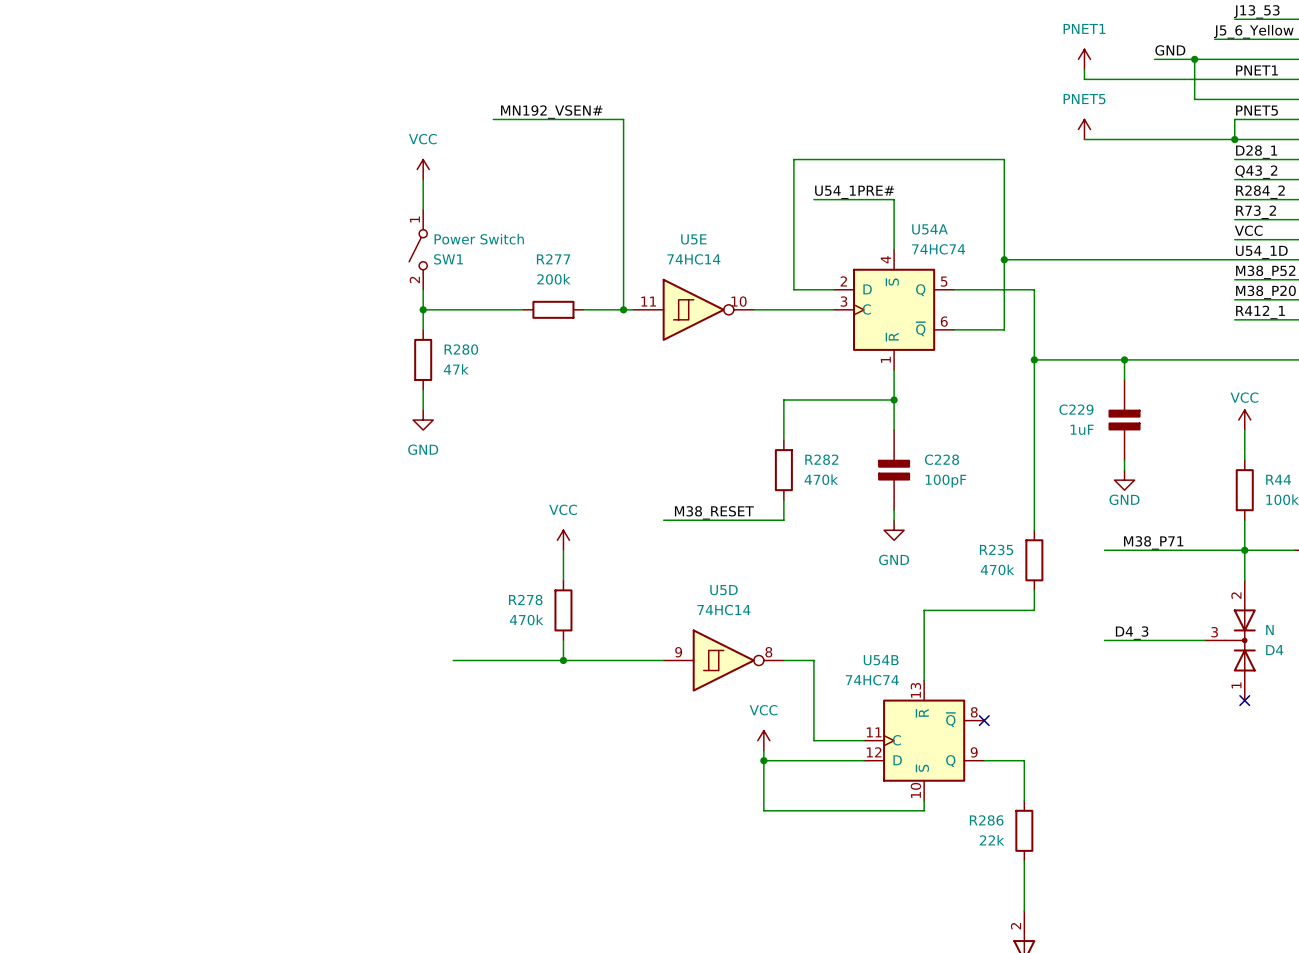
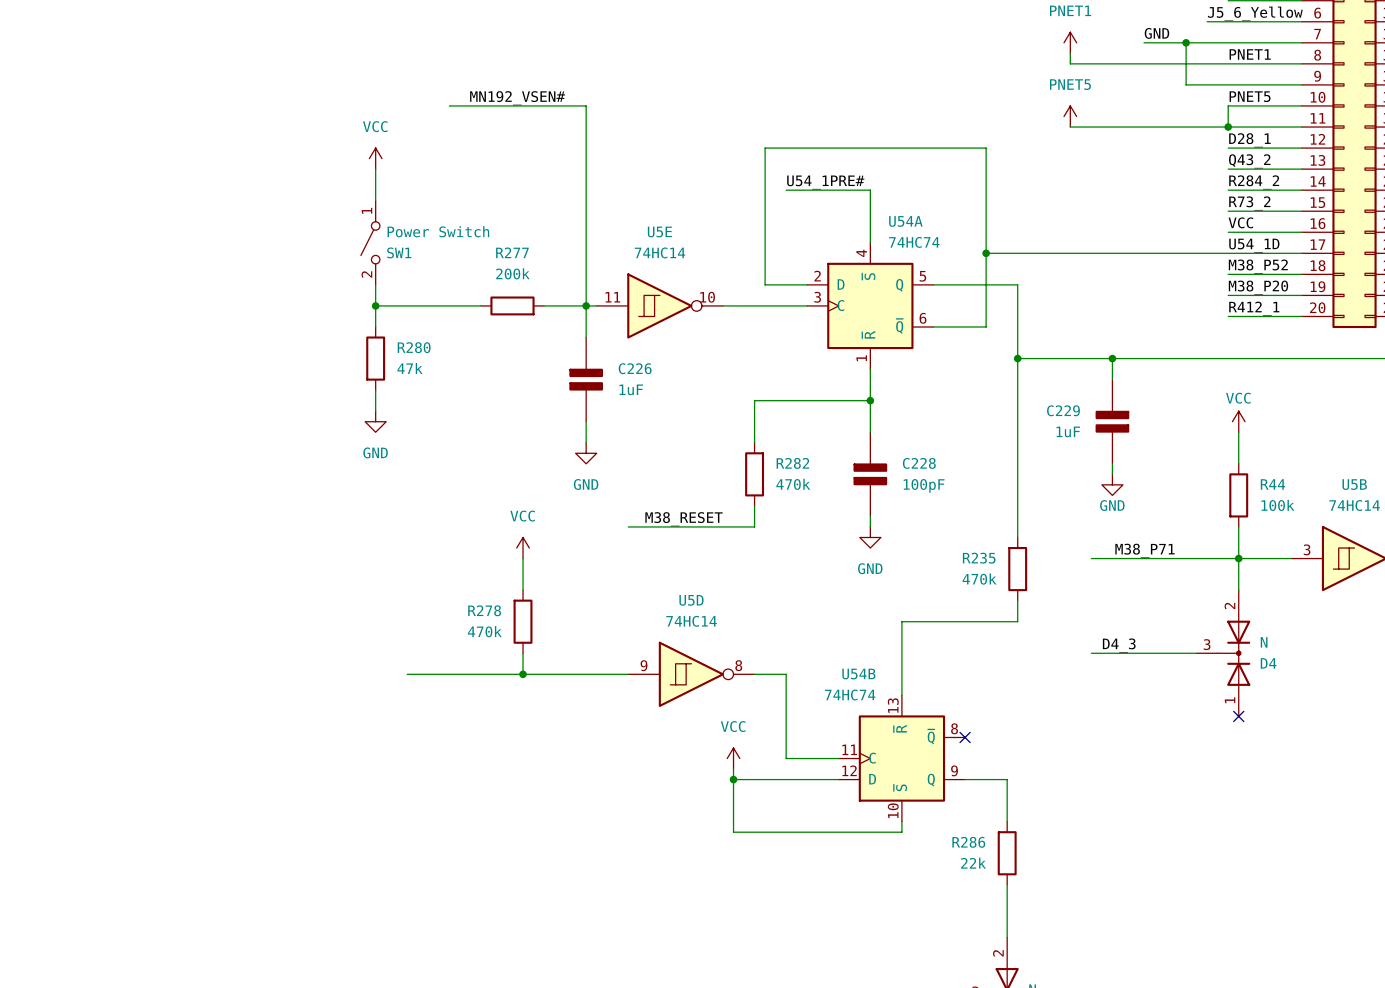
wire: none -> (586, 305) (586, 337)
C226: none -> 1uF (586, 379)
wire: none -> (586, 421) (586, 442)
power symbol: none -> GND (586, 453)

